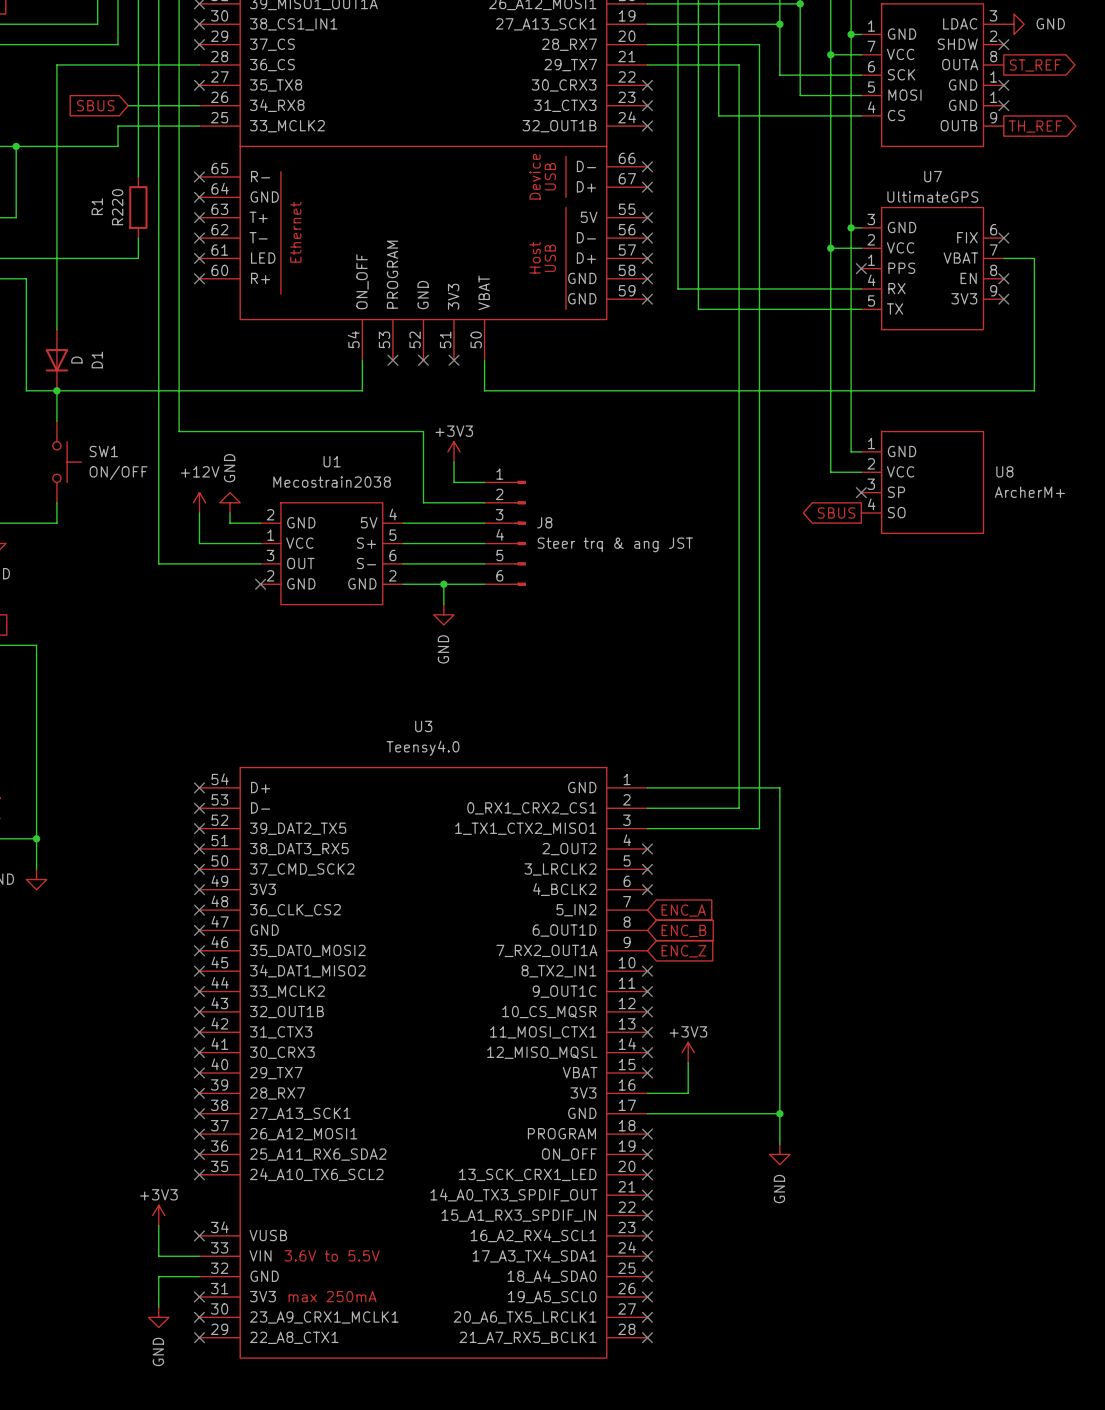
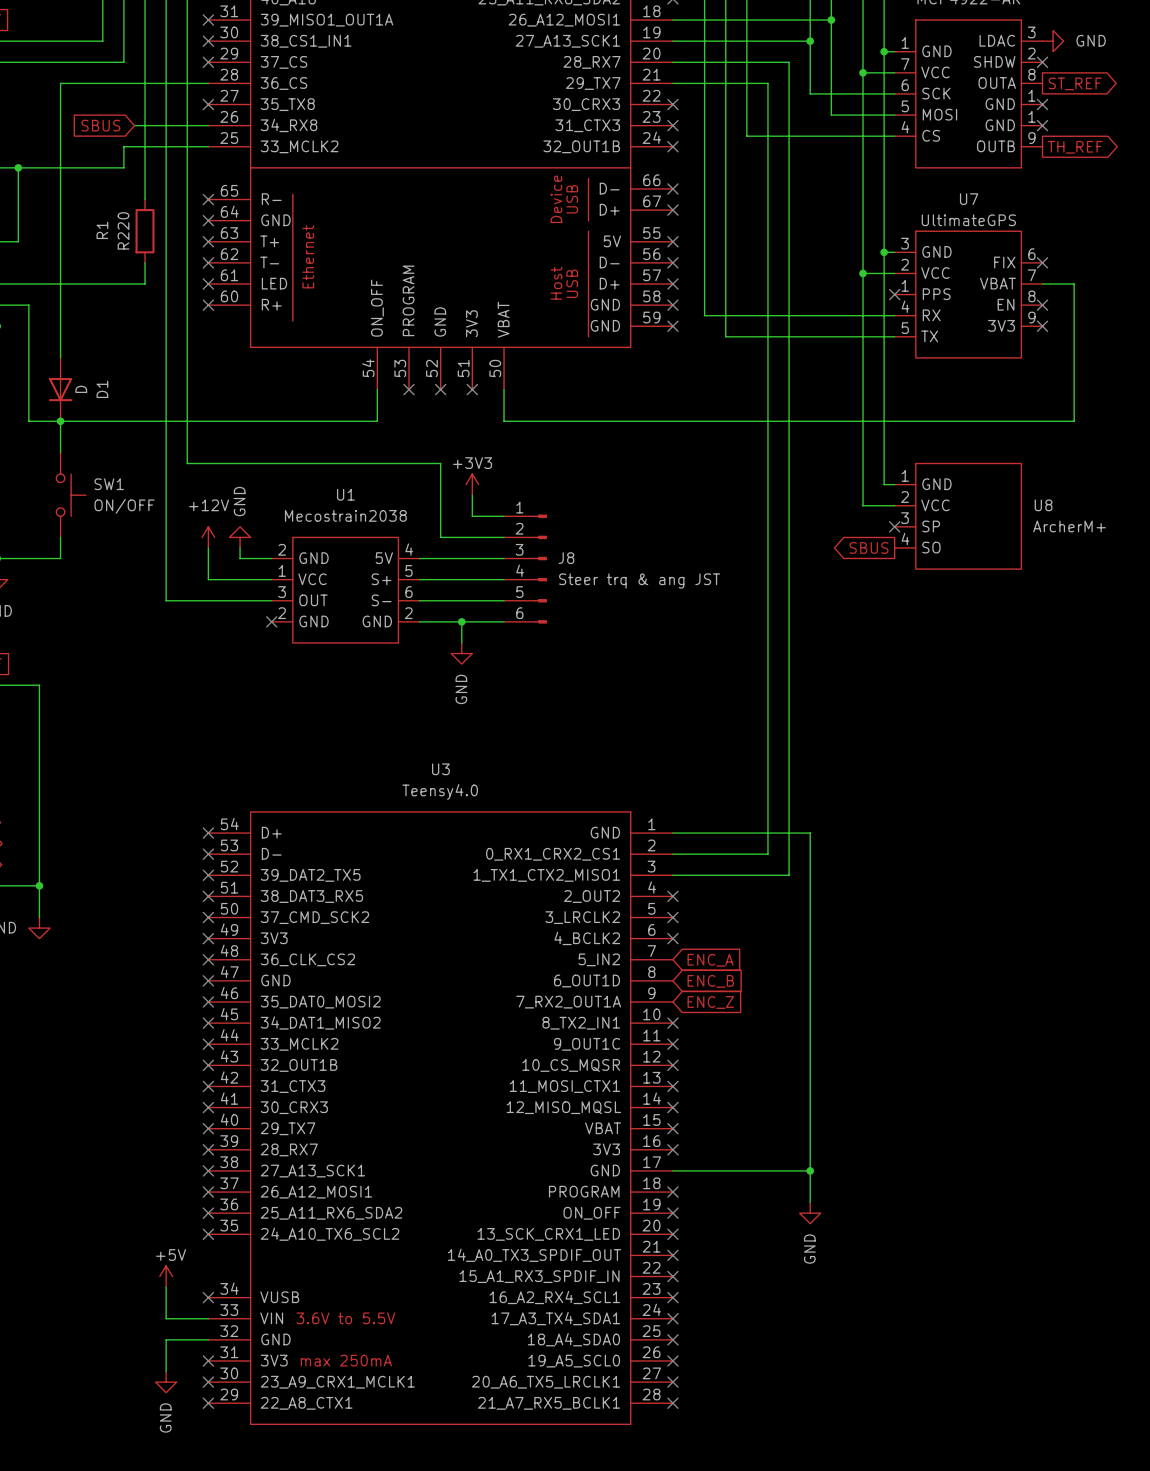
power symbol: +3V3 (688, 1052) -> none
wire: (688, 1062) (688, 1093) (647, 1093) -> none
no-connect mark: none -> (672, 1149)
power symbol: +3V3 (158, 1215) -> +5V (166, 1276)

